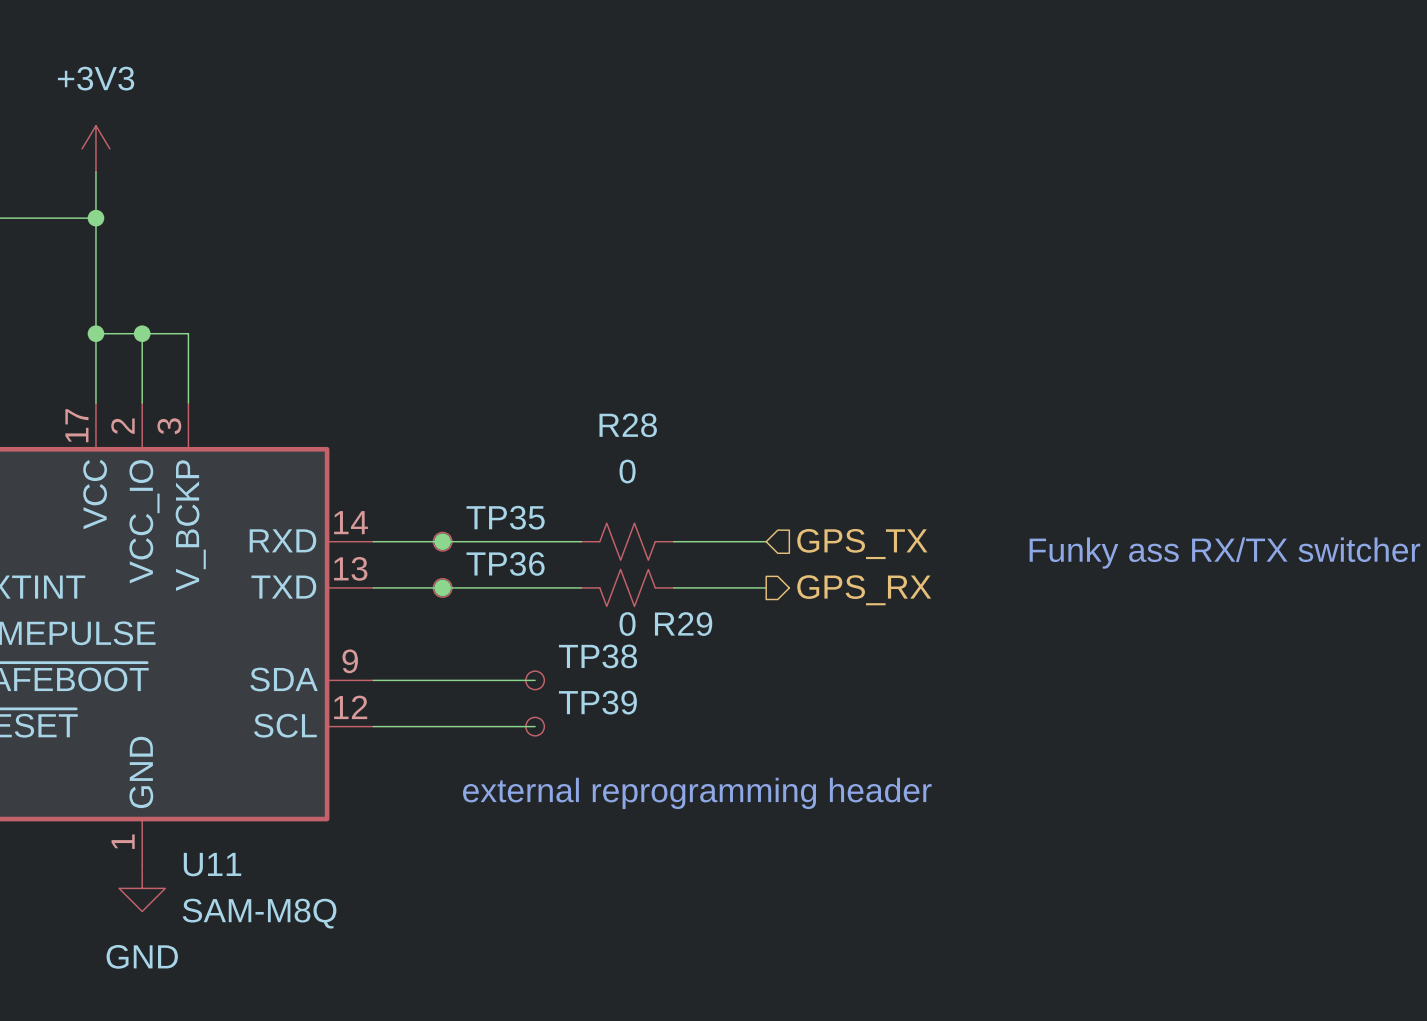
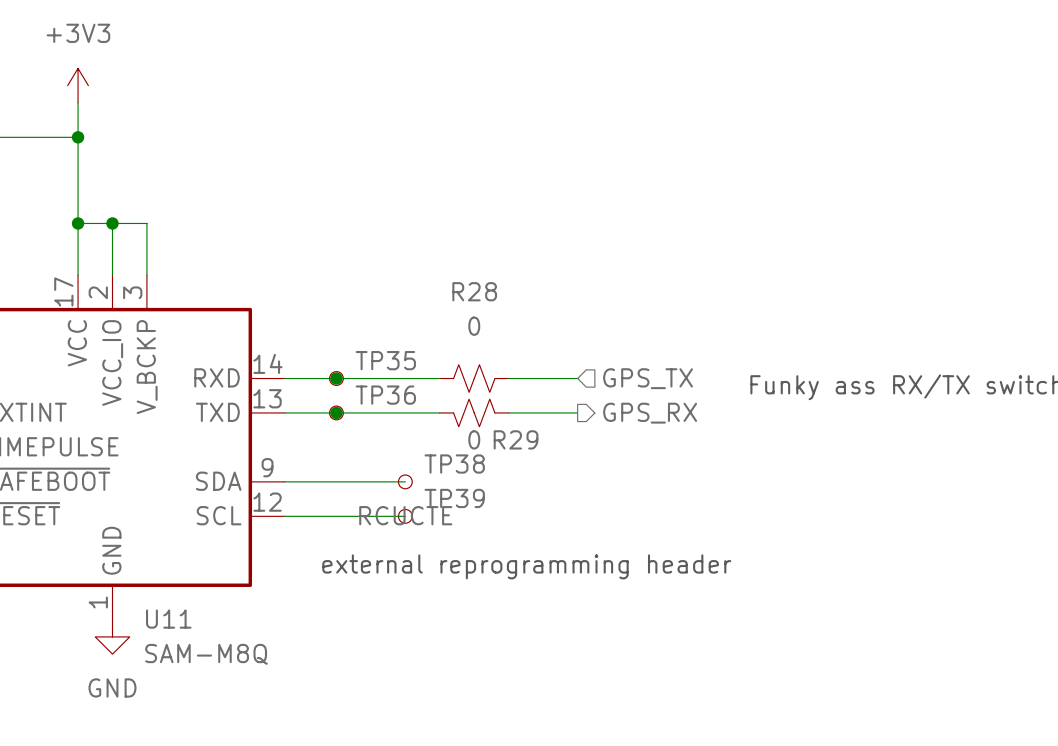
TP39 text: none -> RCUCTE (405, 515)

